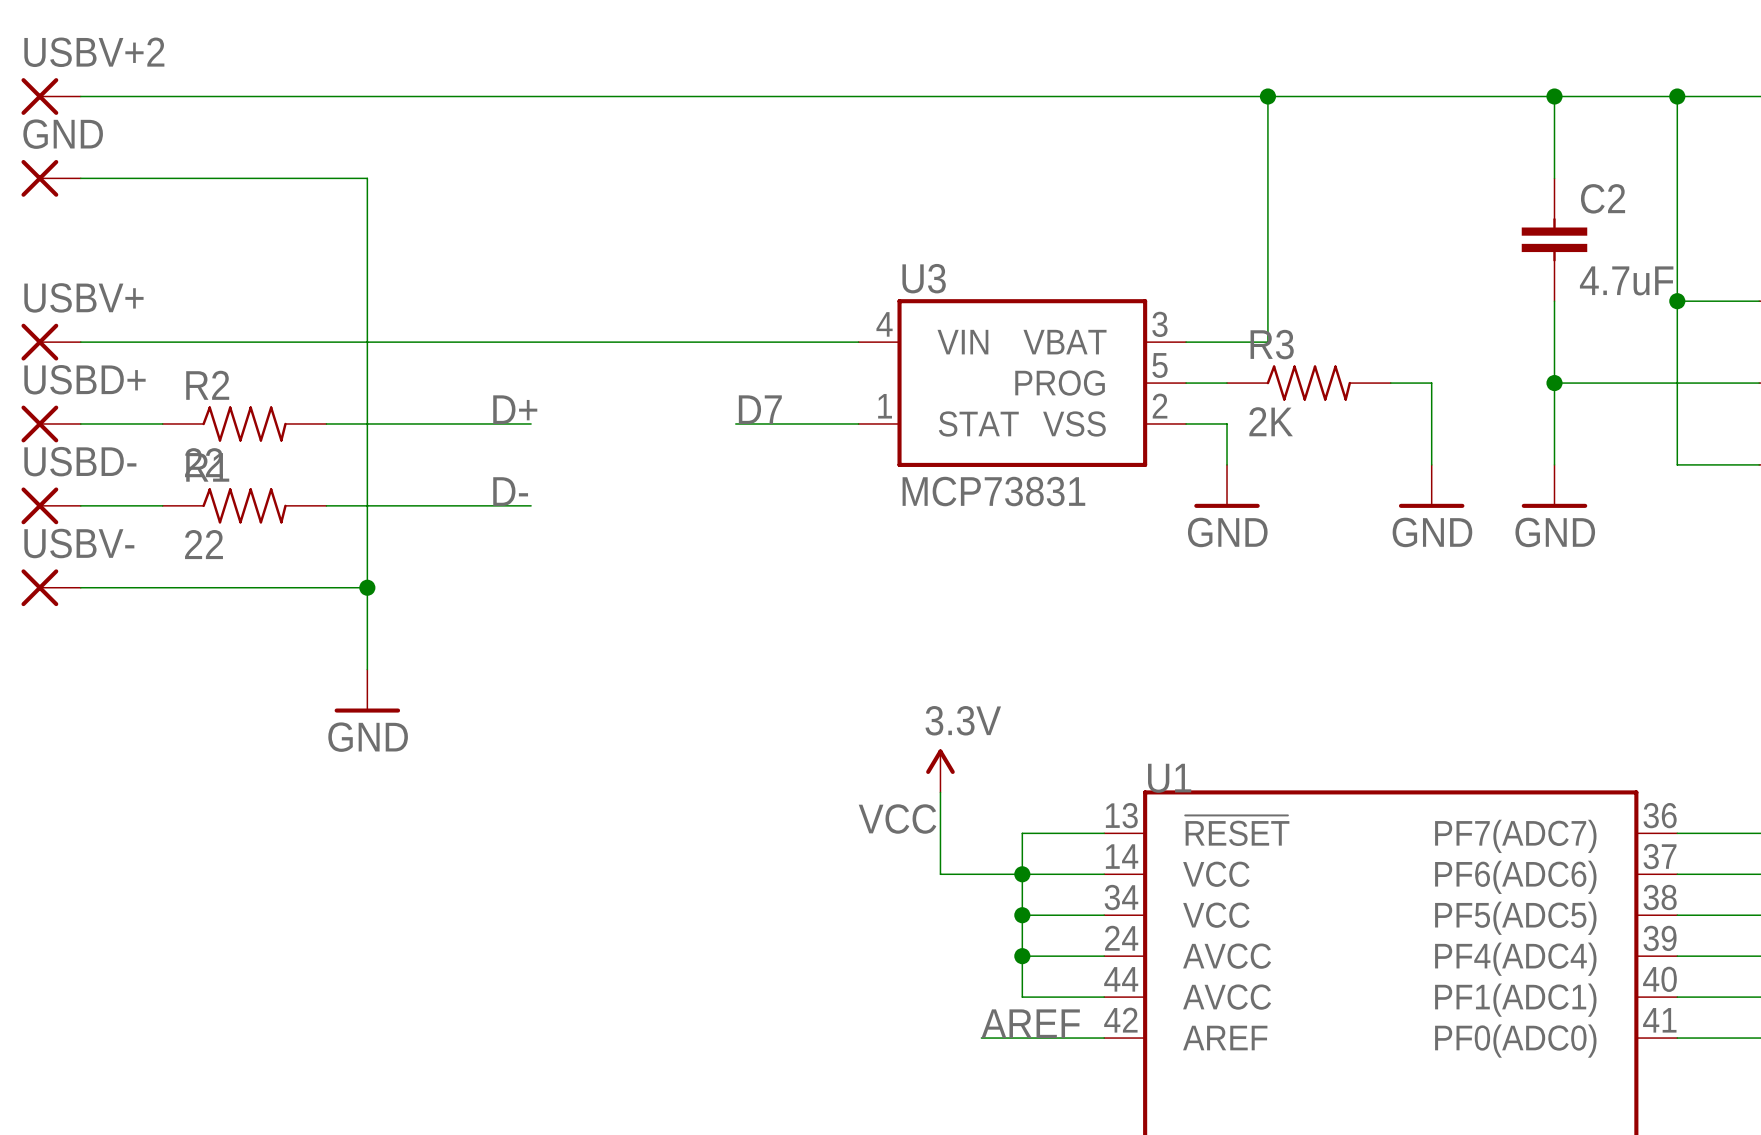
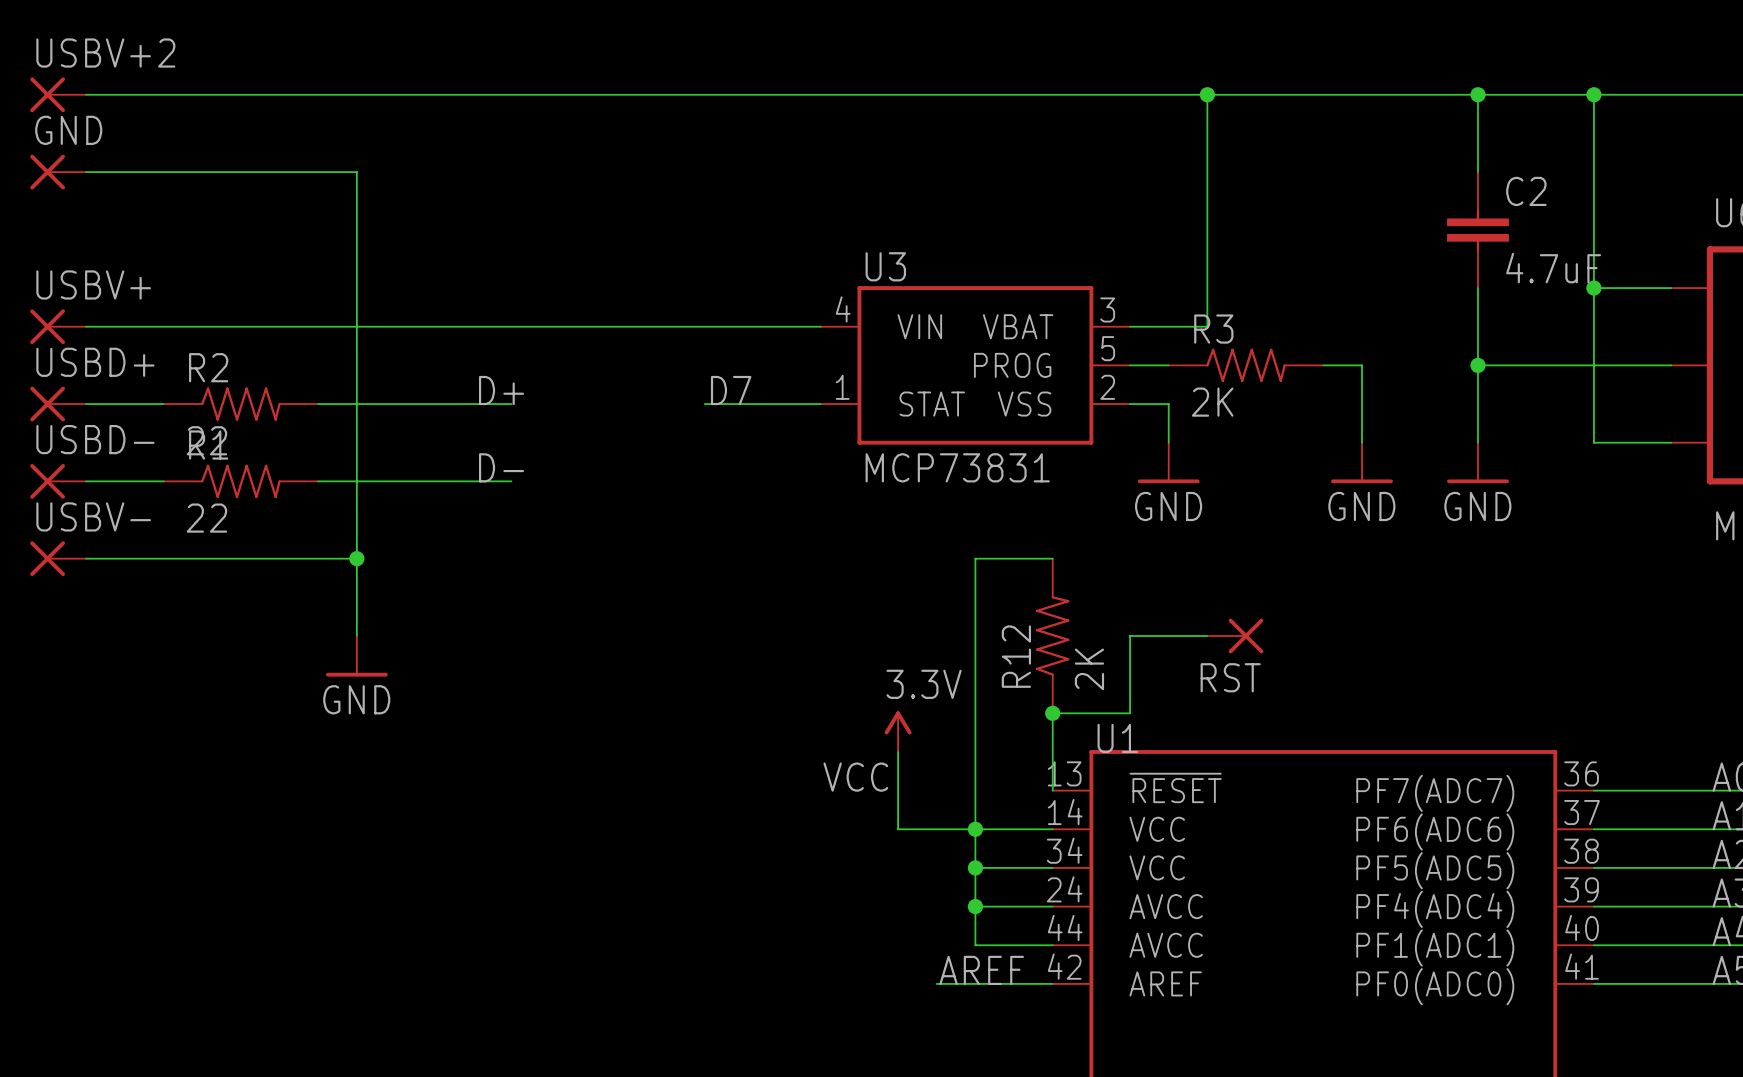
R12: none -> 2K (1052, 636)
wire: none -> (1207, 636) (1130, 636) (1130, 713) (1052, 713) (1052, 790)
RST: none -> (1235, 636)
junction: none -> (1052, 713)
wire: (1022, 833) (1104, 833) -> (975, 790) (975, 558) (1052, 558)

